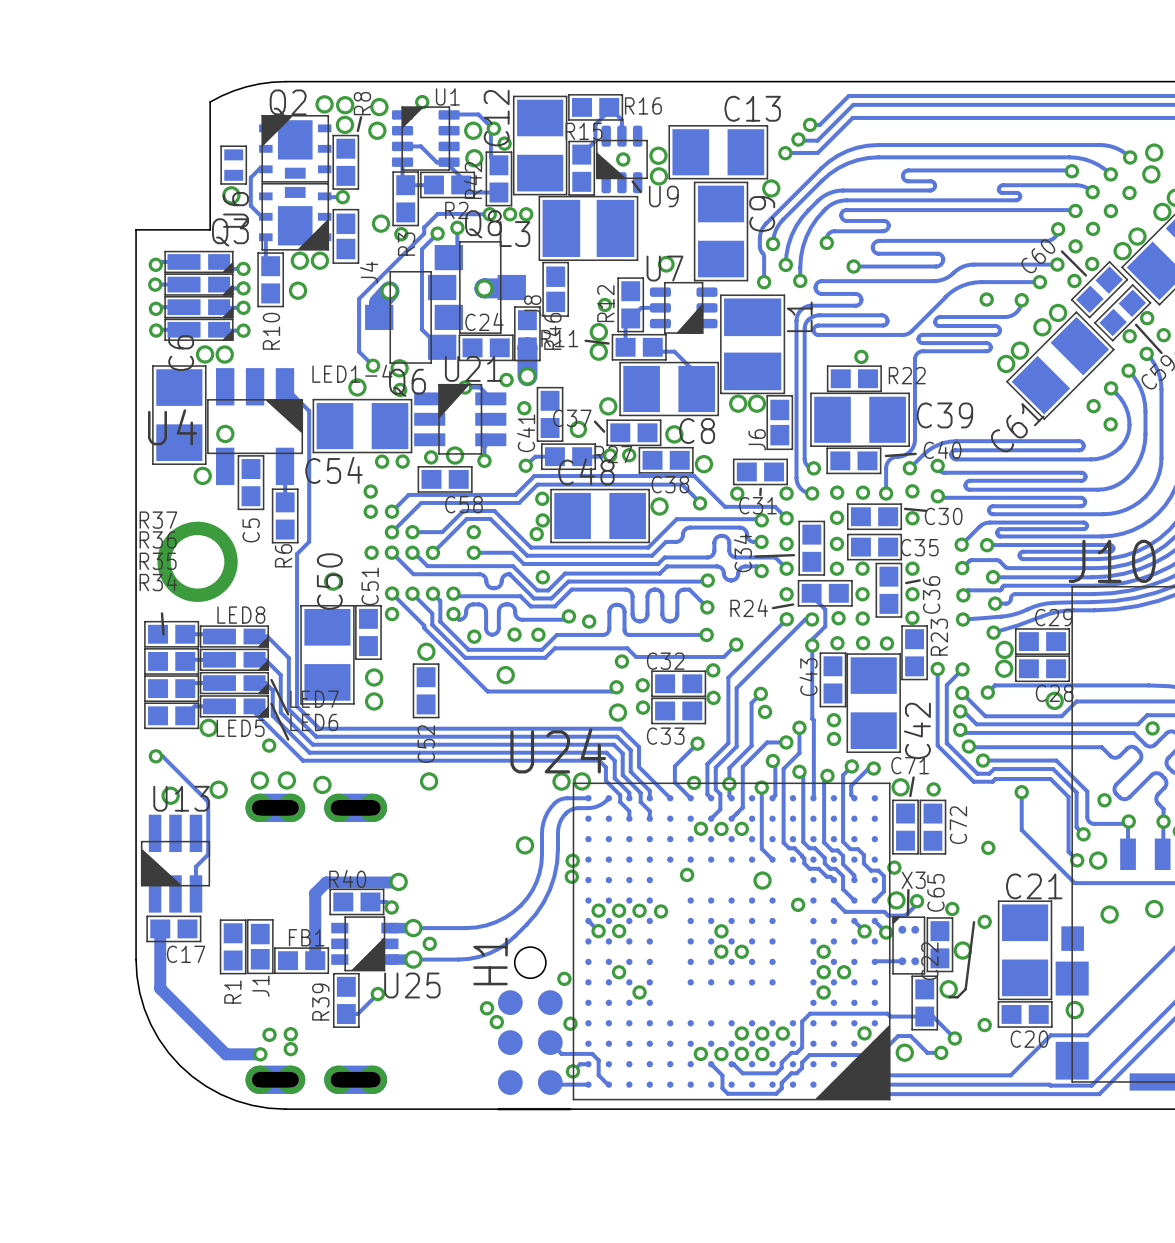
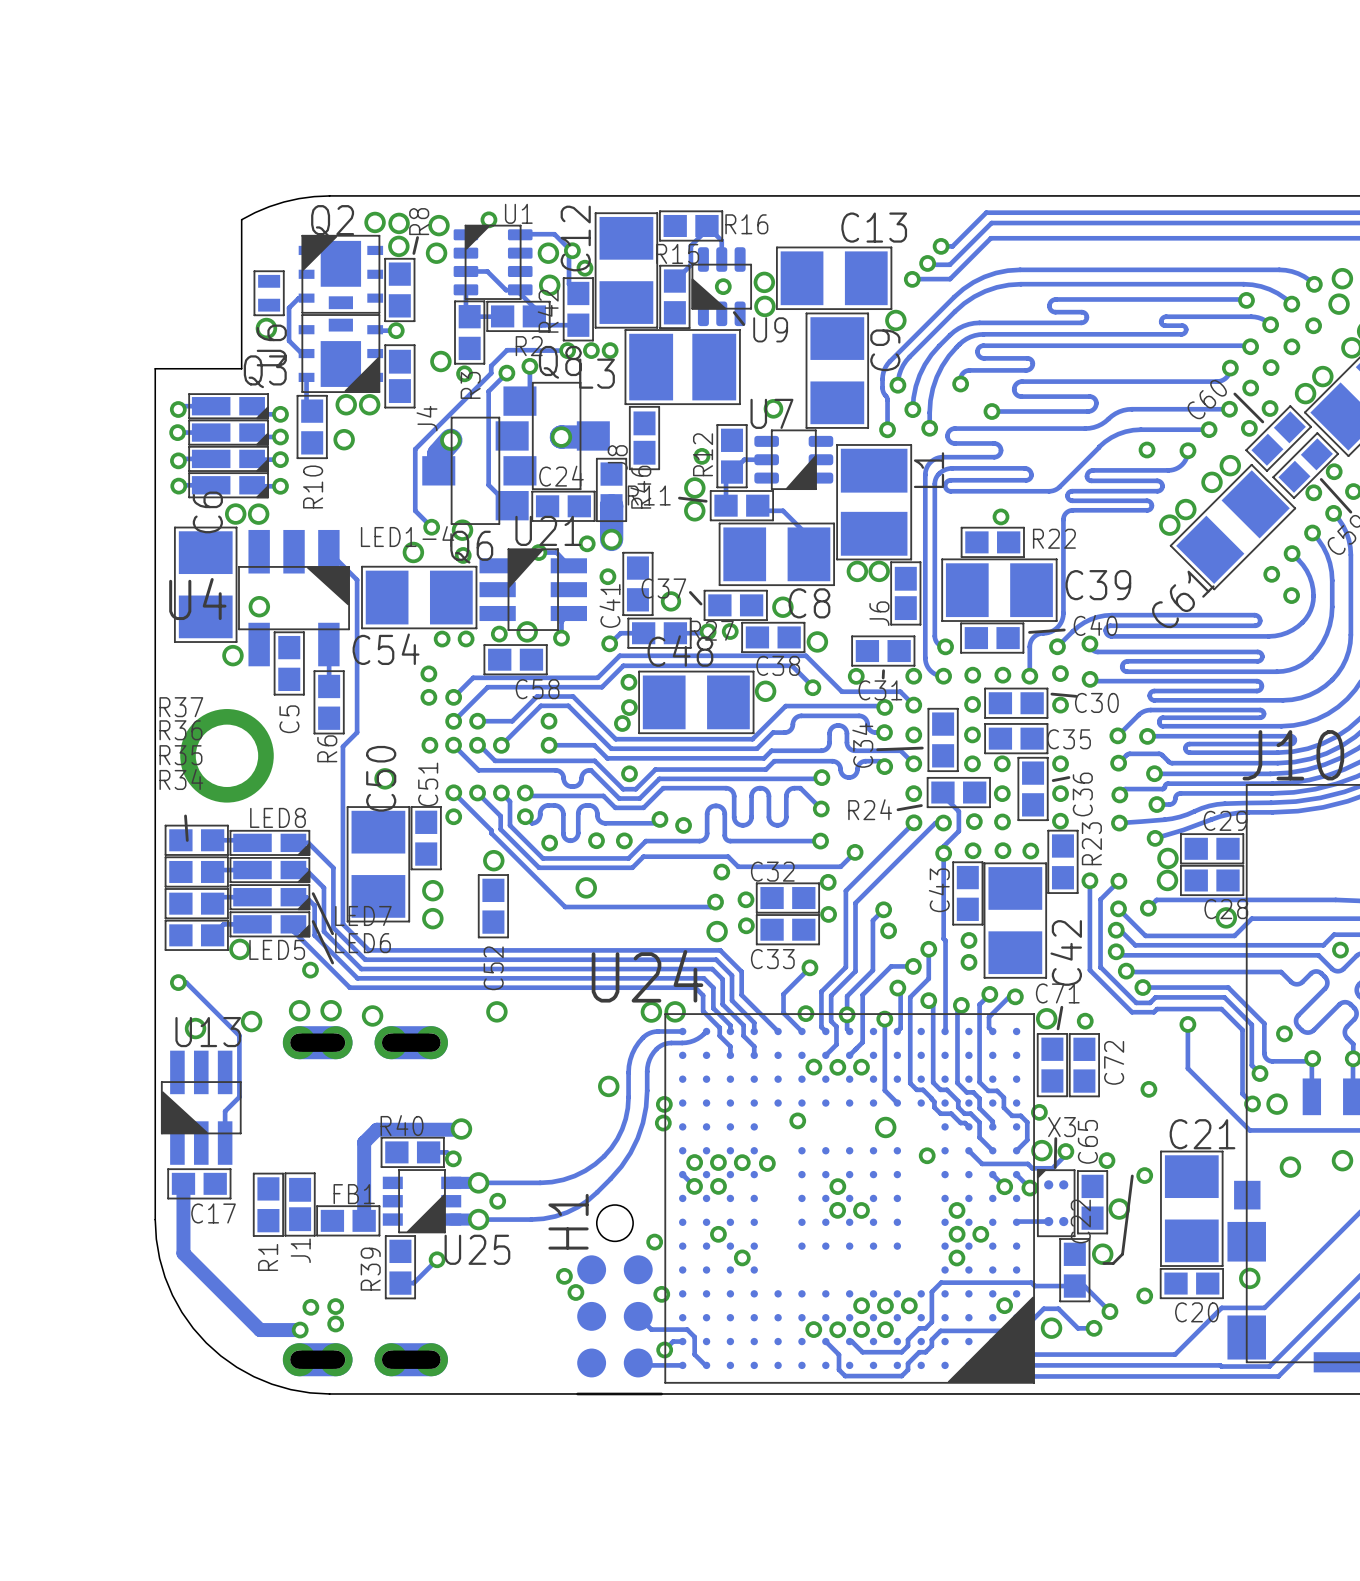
via: (608, 406) -> none

